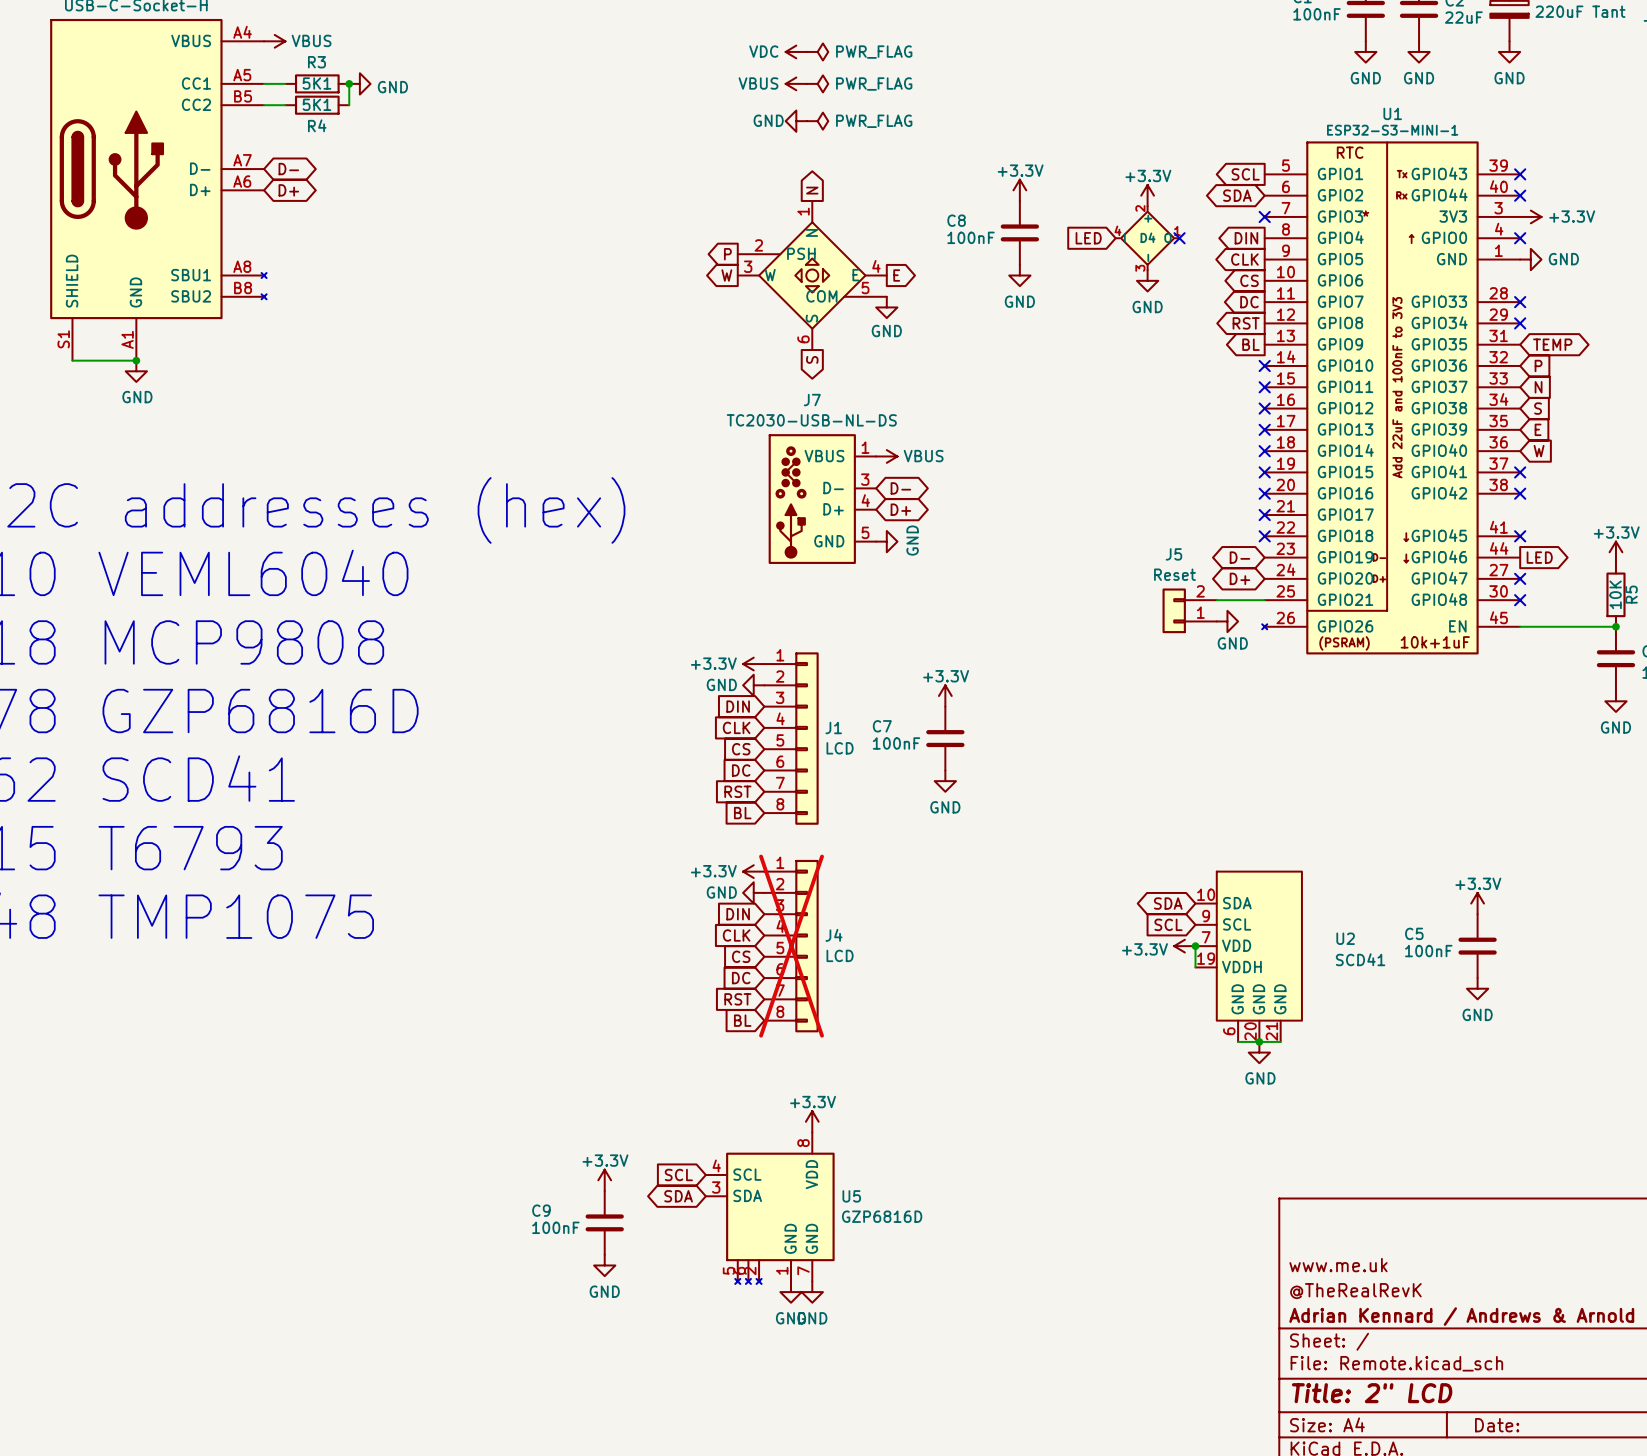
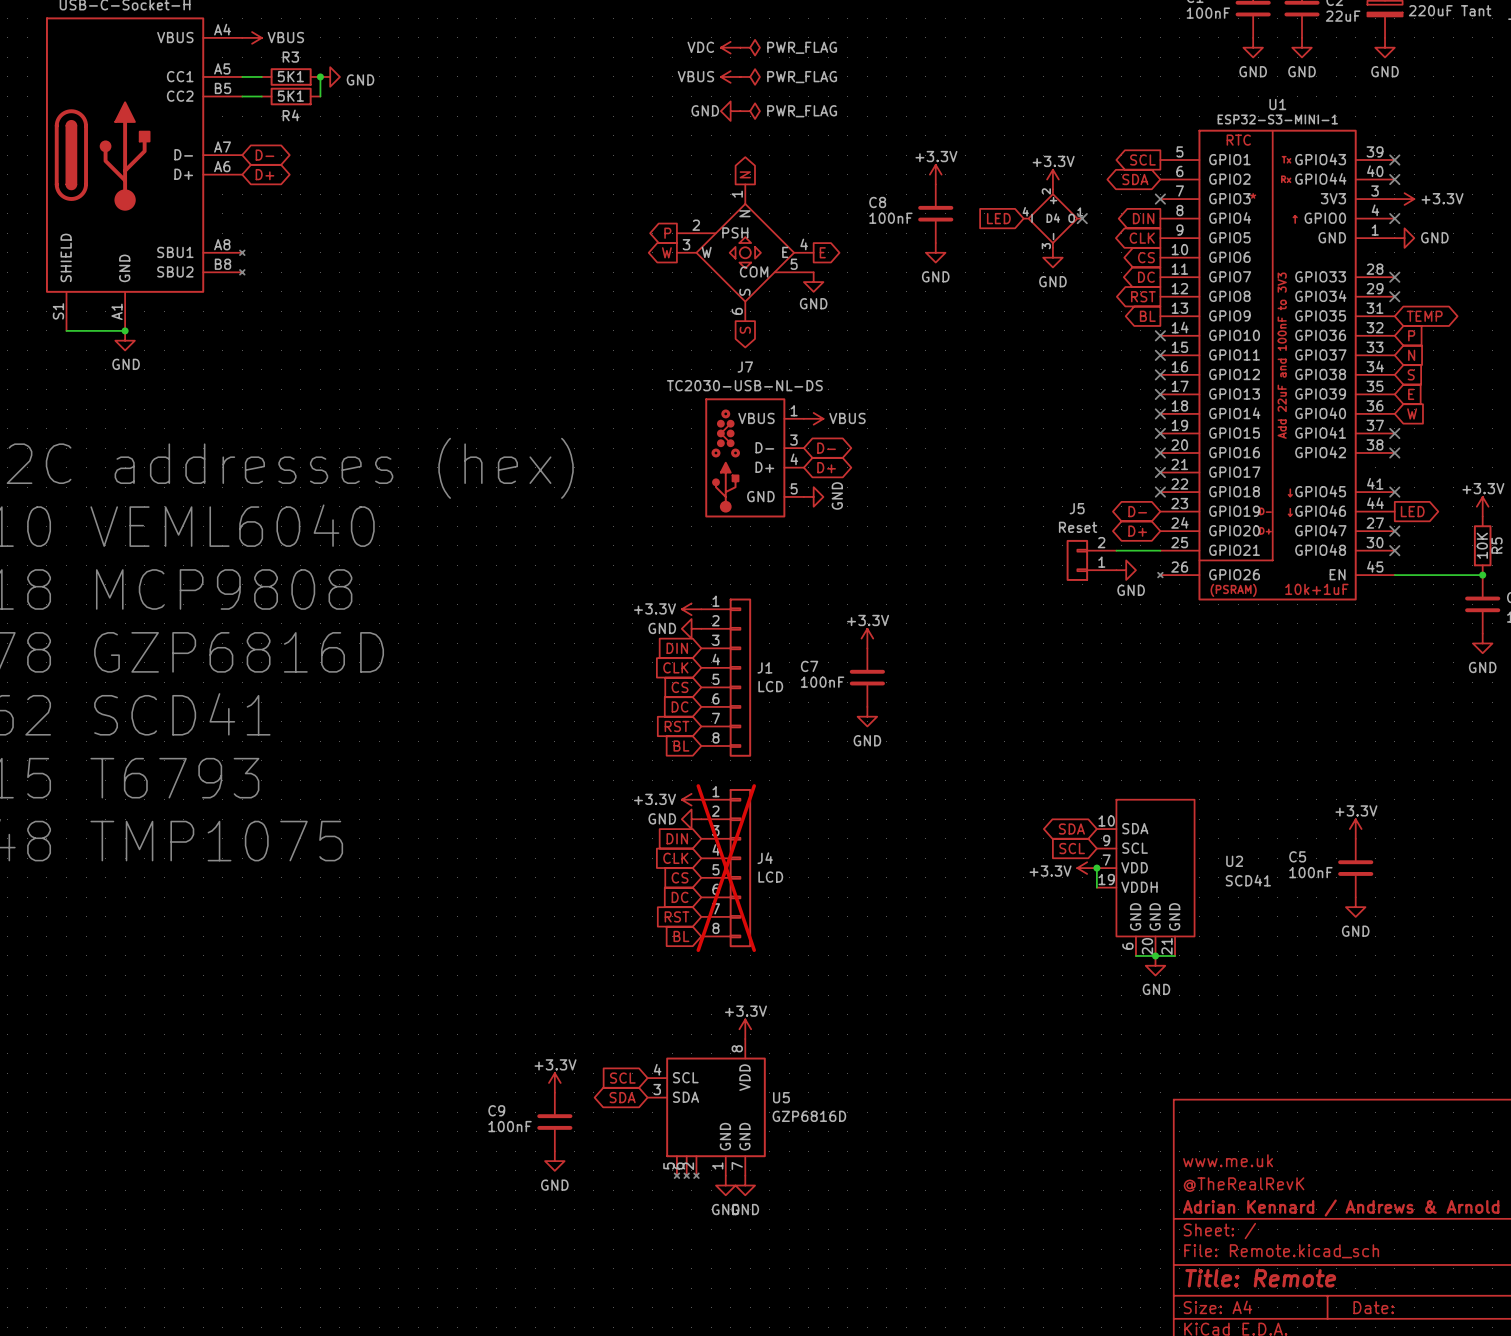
title block: Title: 2" LCD (1372, 1393) -> Title: Remote (1260, 1278)

